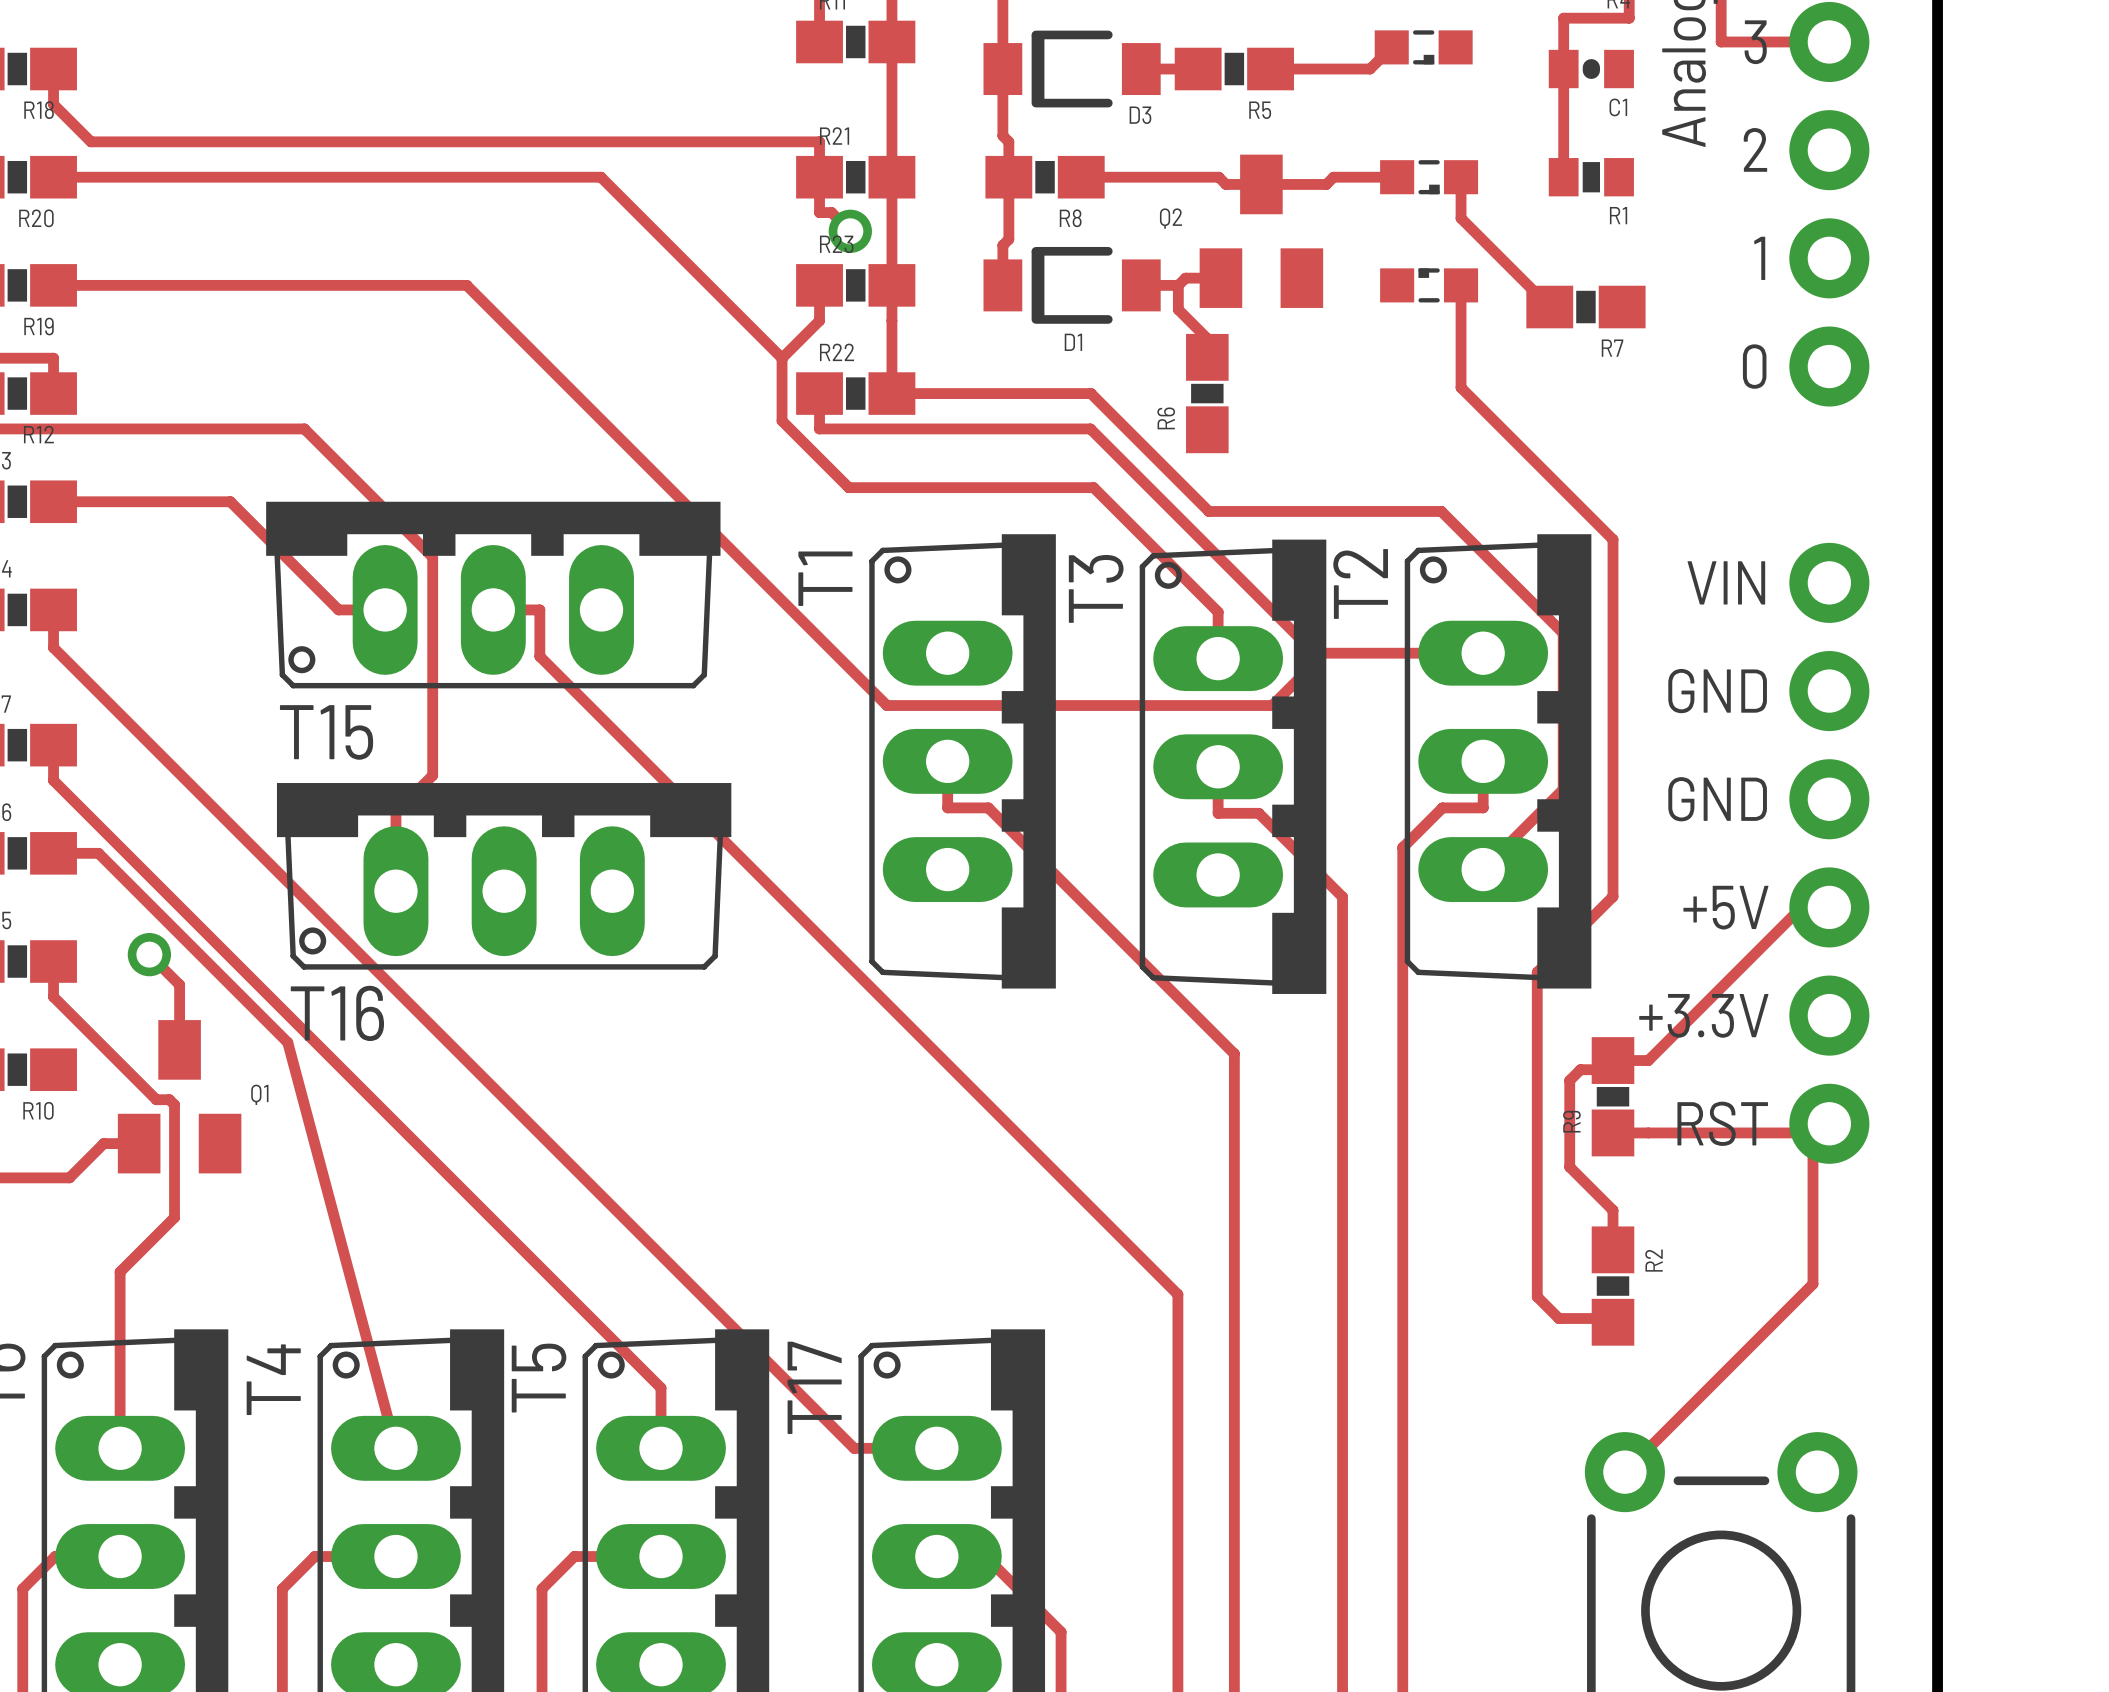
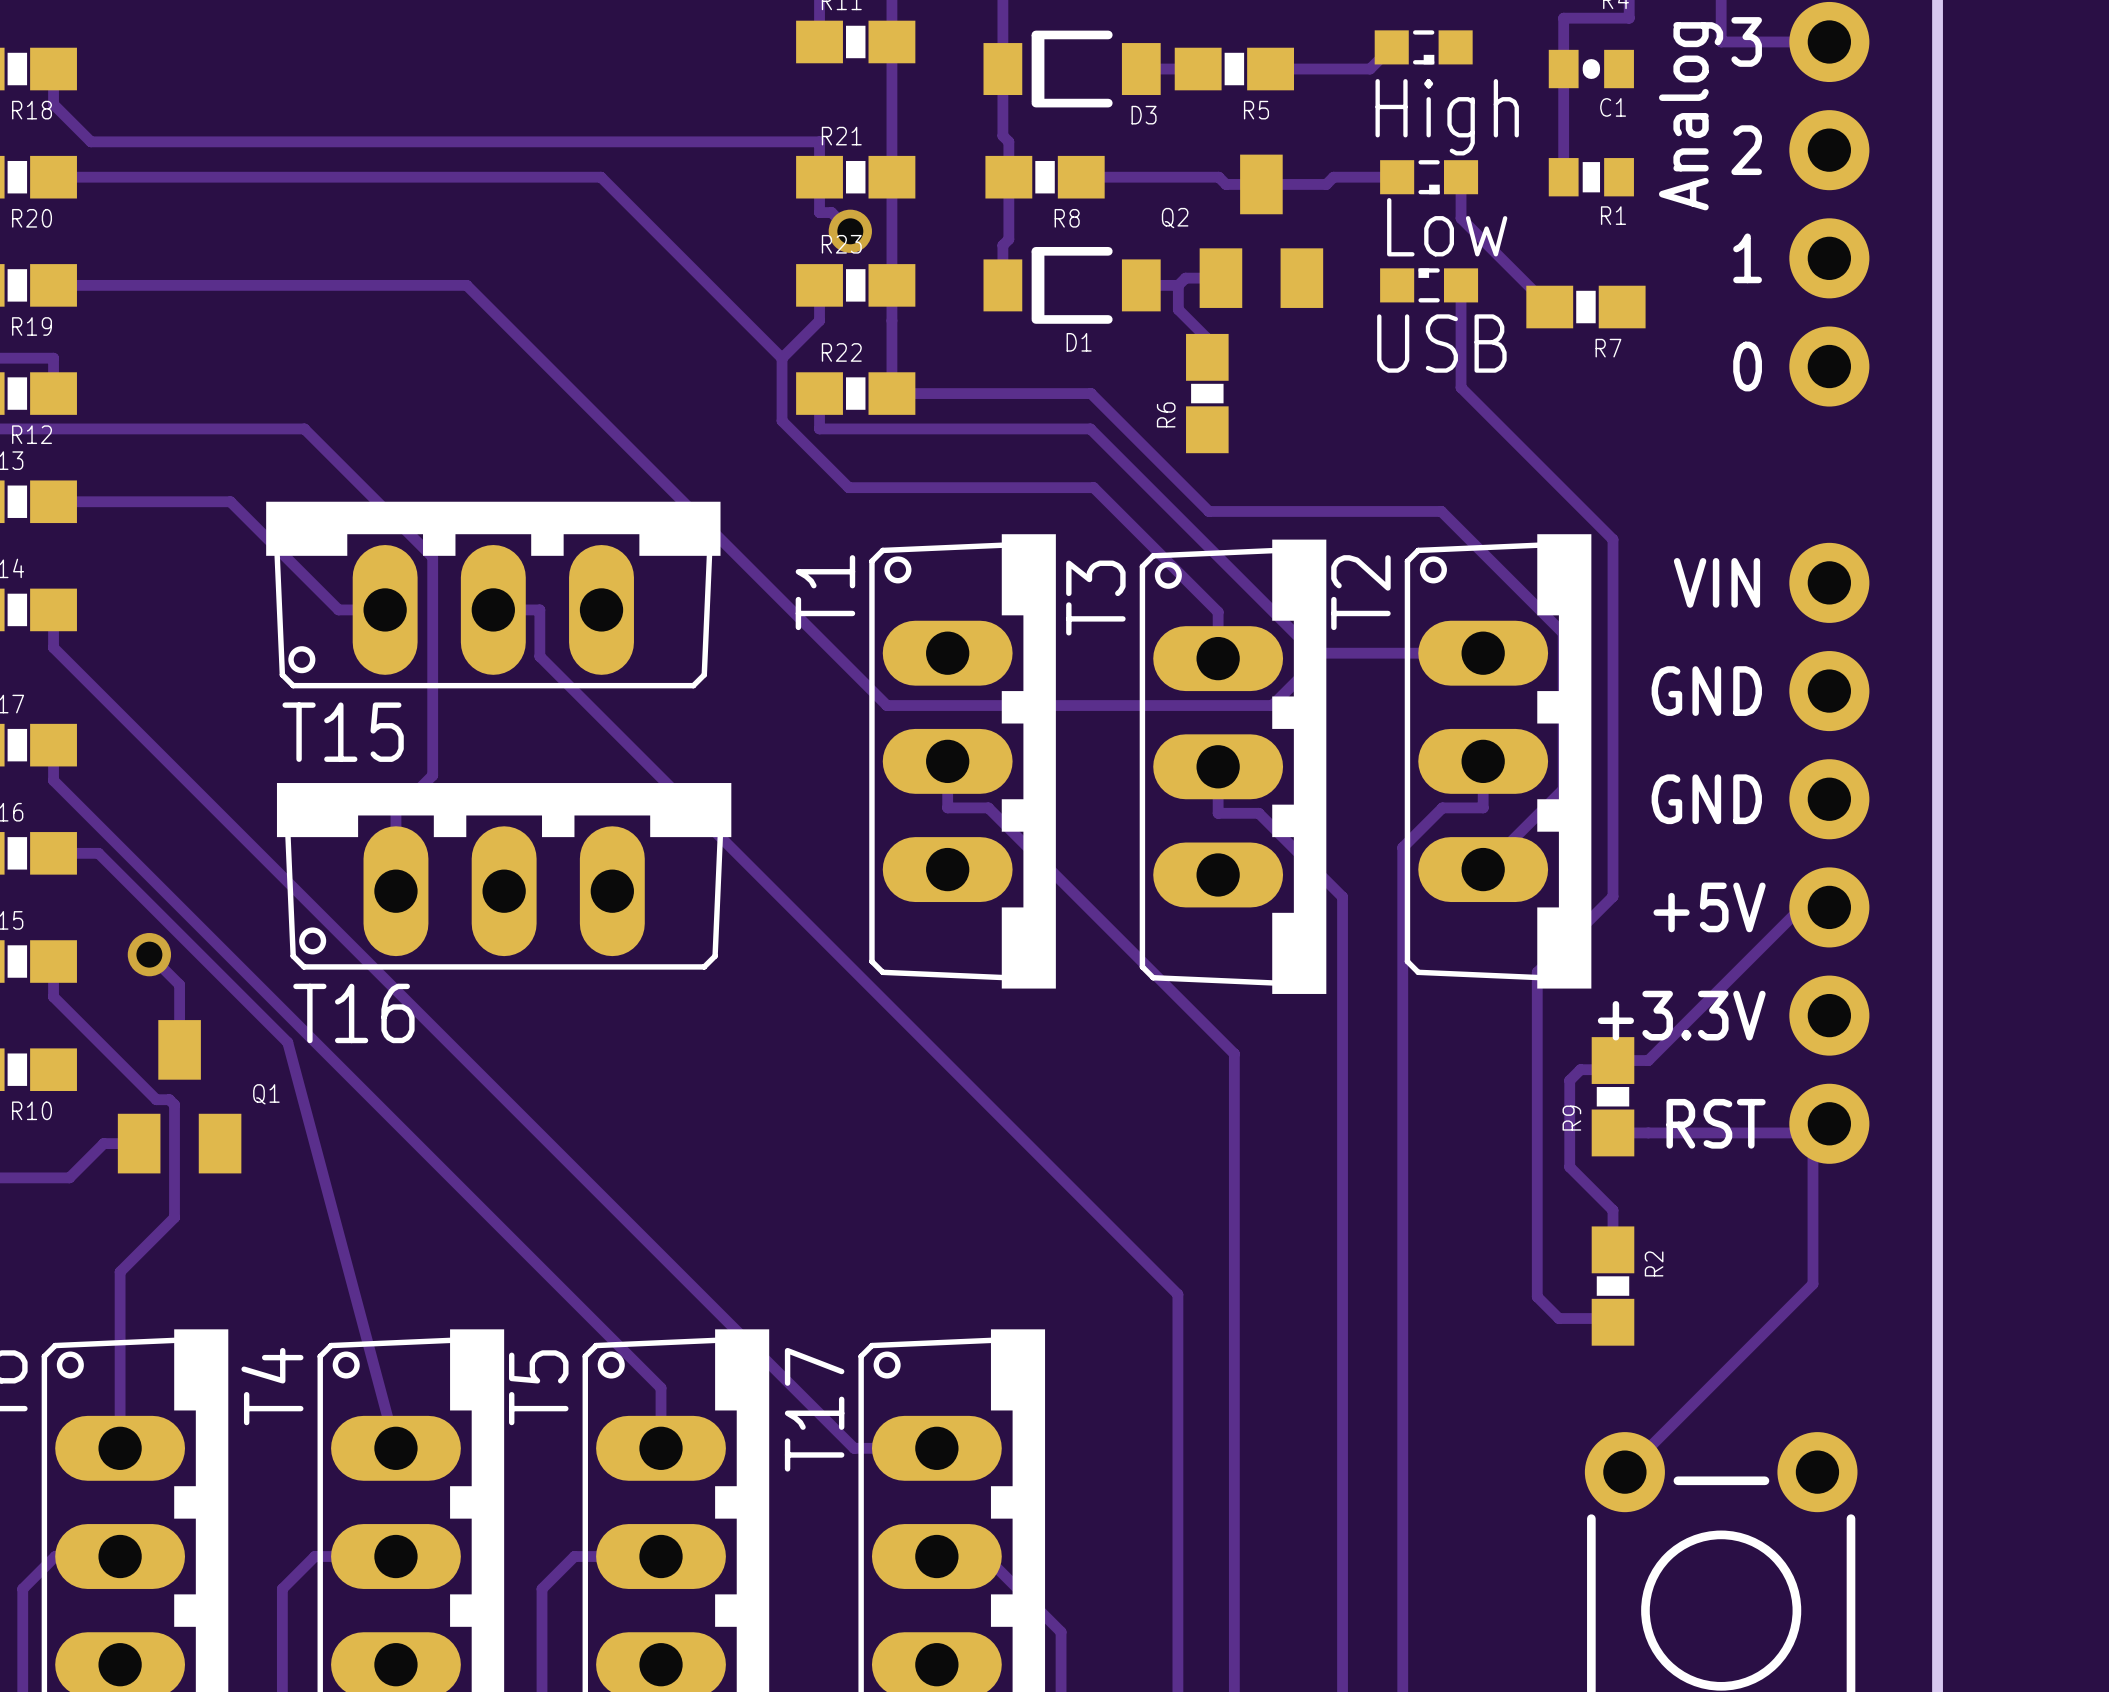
part value: none -> High (1447, 117)
part value: none -> Low (1447, 227)
part value: none -> USB (1441, 343)

